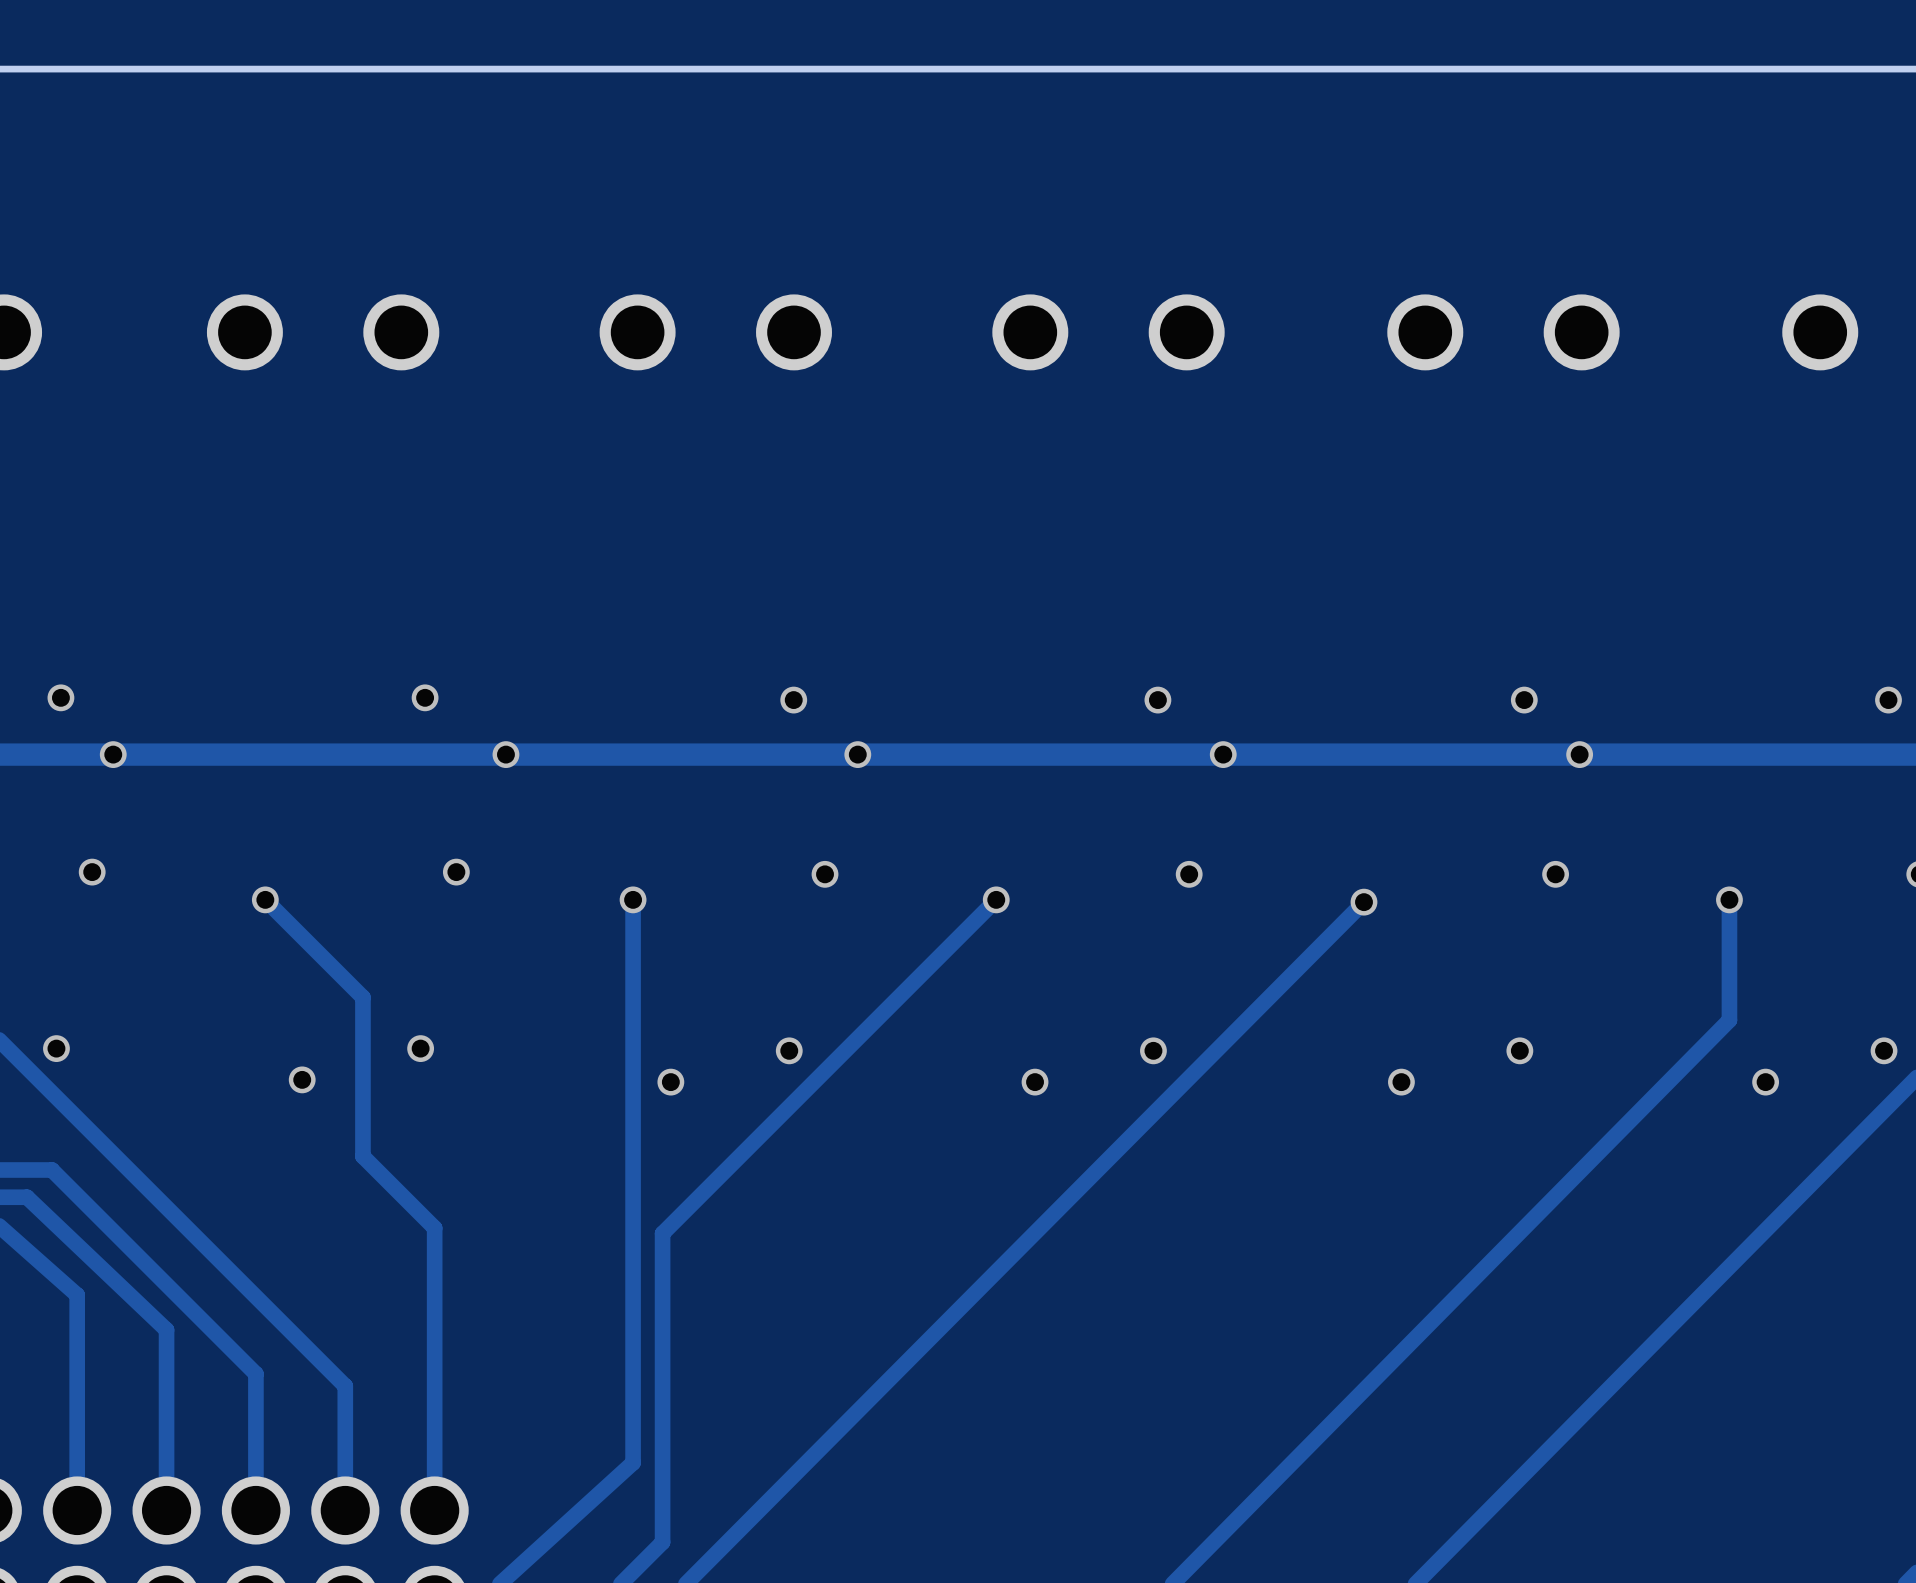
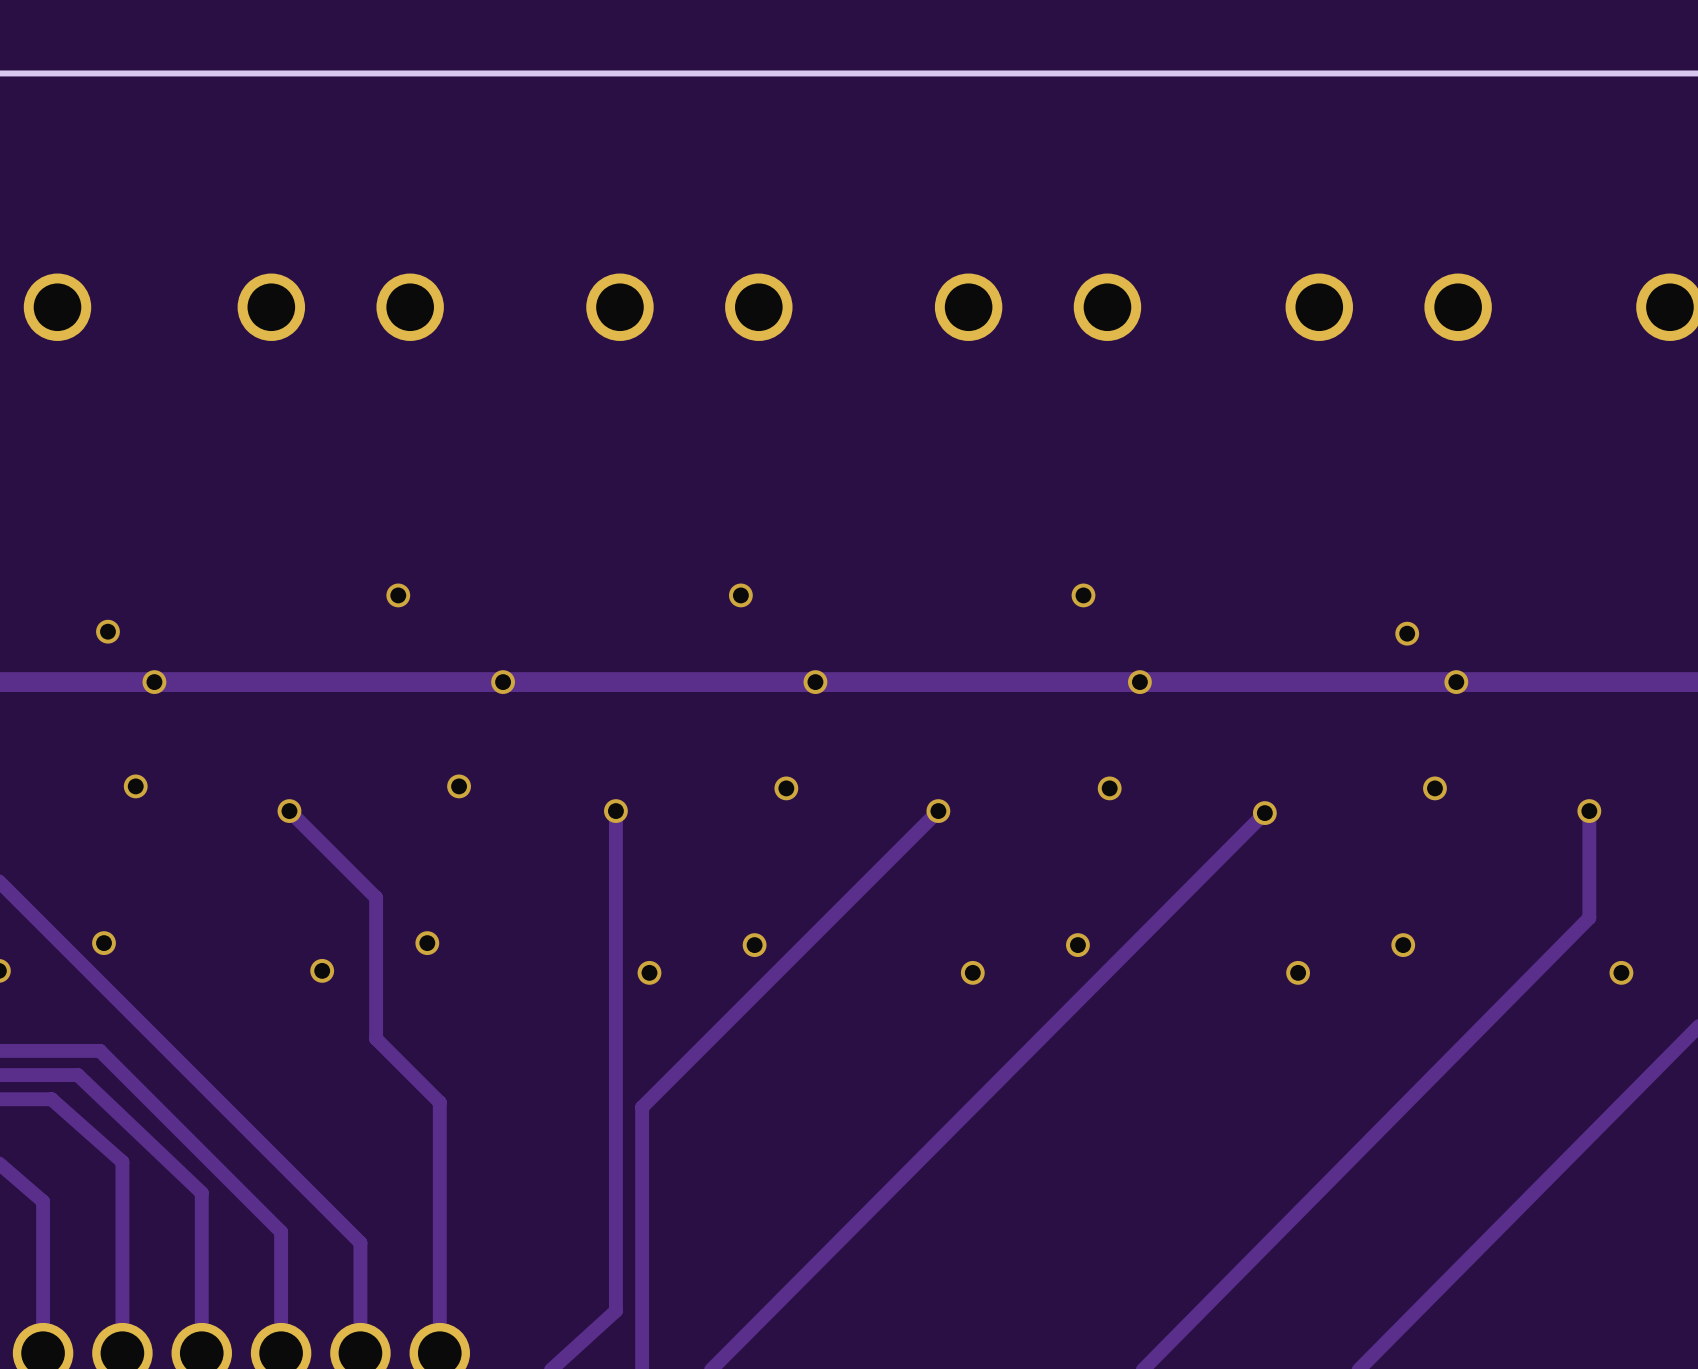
via position: (425, 697) -> (398, 595)
via position: (793, 700) -> (740, 595)
via position: (1157, 700) -> (1083, 595)

